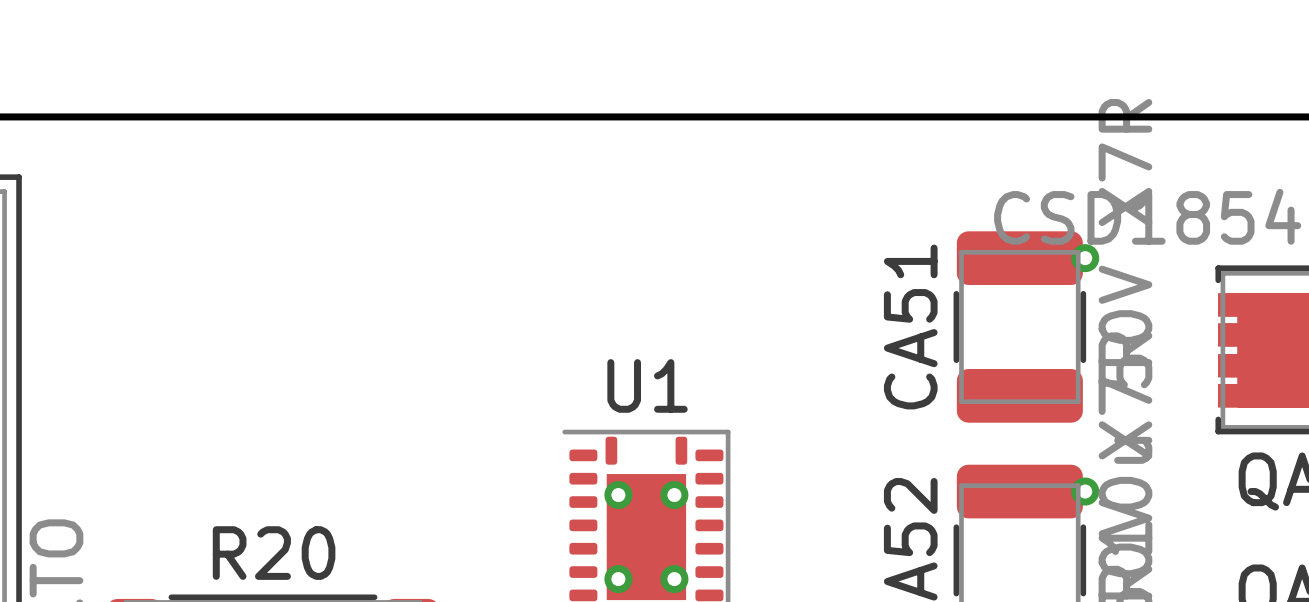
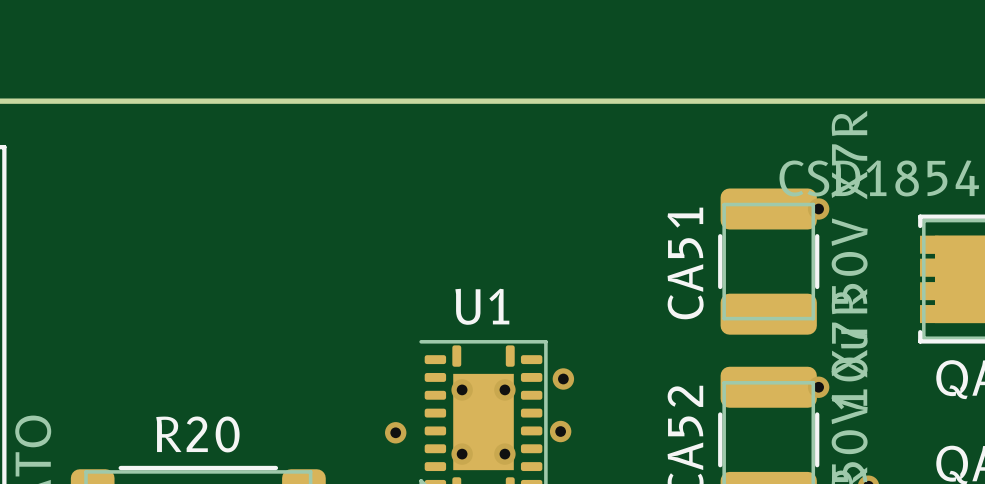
via: none -> (563, 378)
via: none -> (560, 431)
via: none -> (395, 432)

